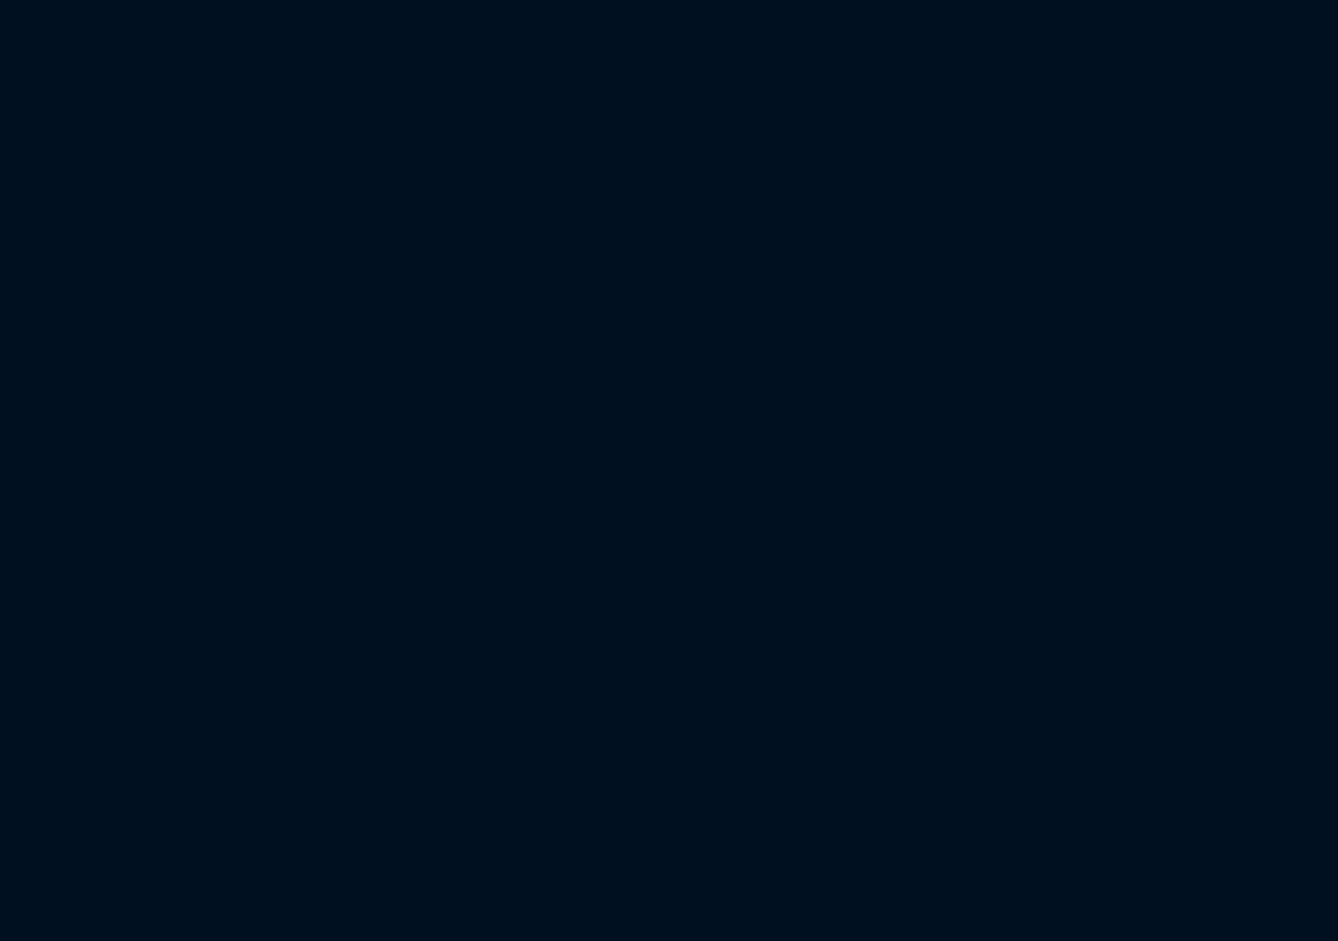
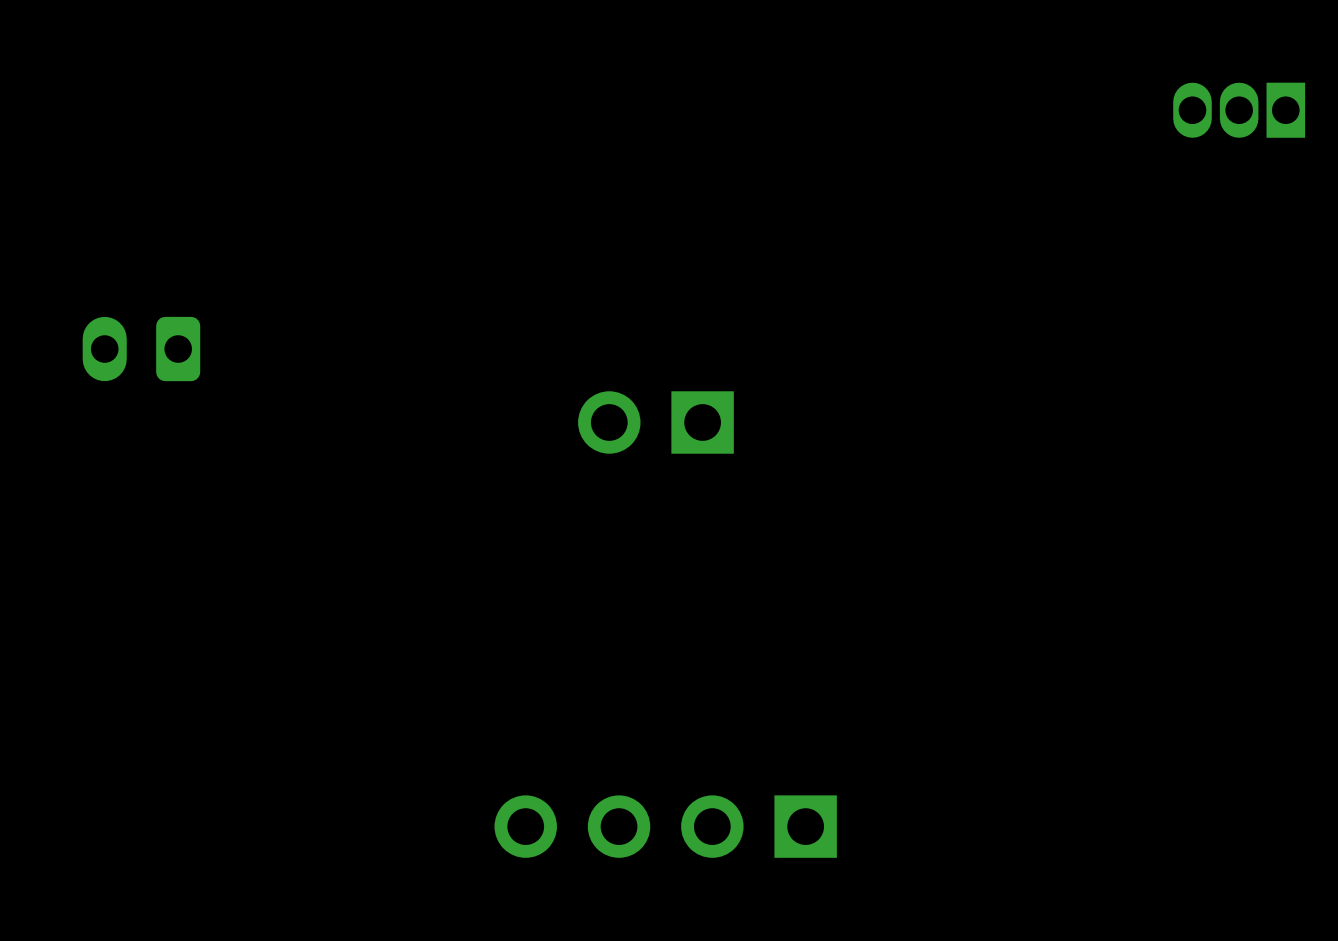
part: none -> (1239, 110)
part: none -> (141, 349)
part: none -> (655, 422)
part: none -> (665, 826)

